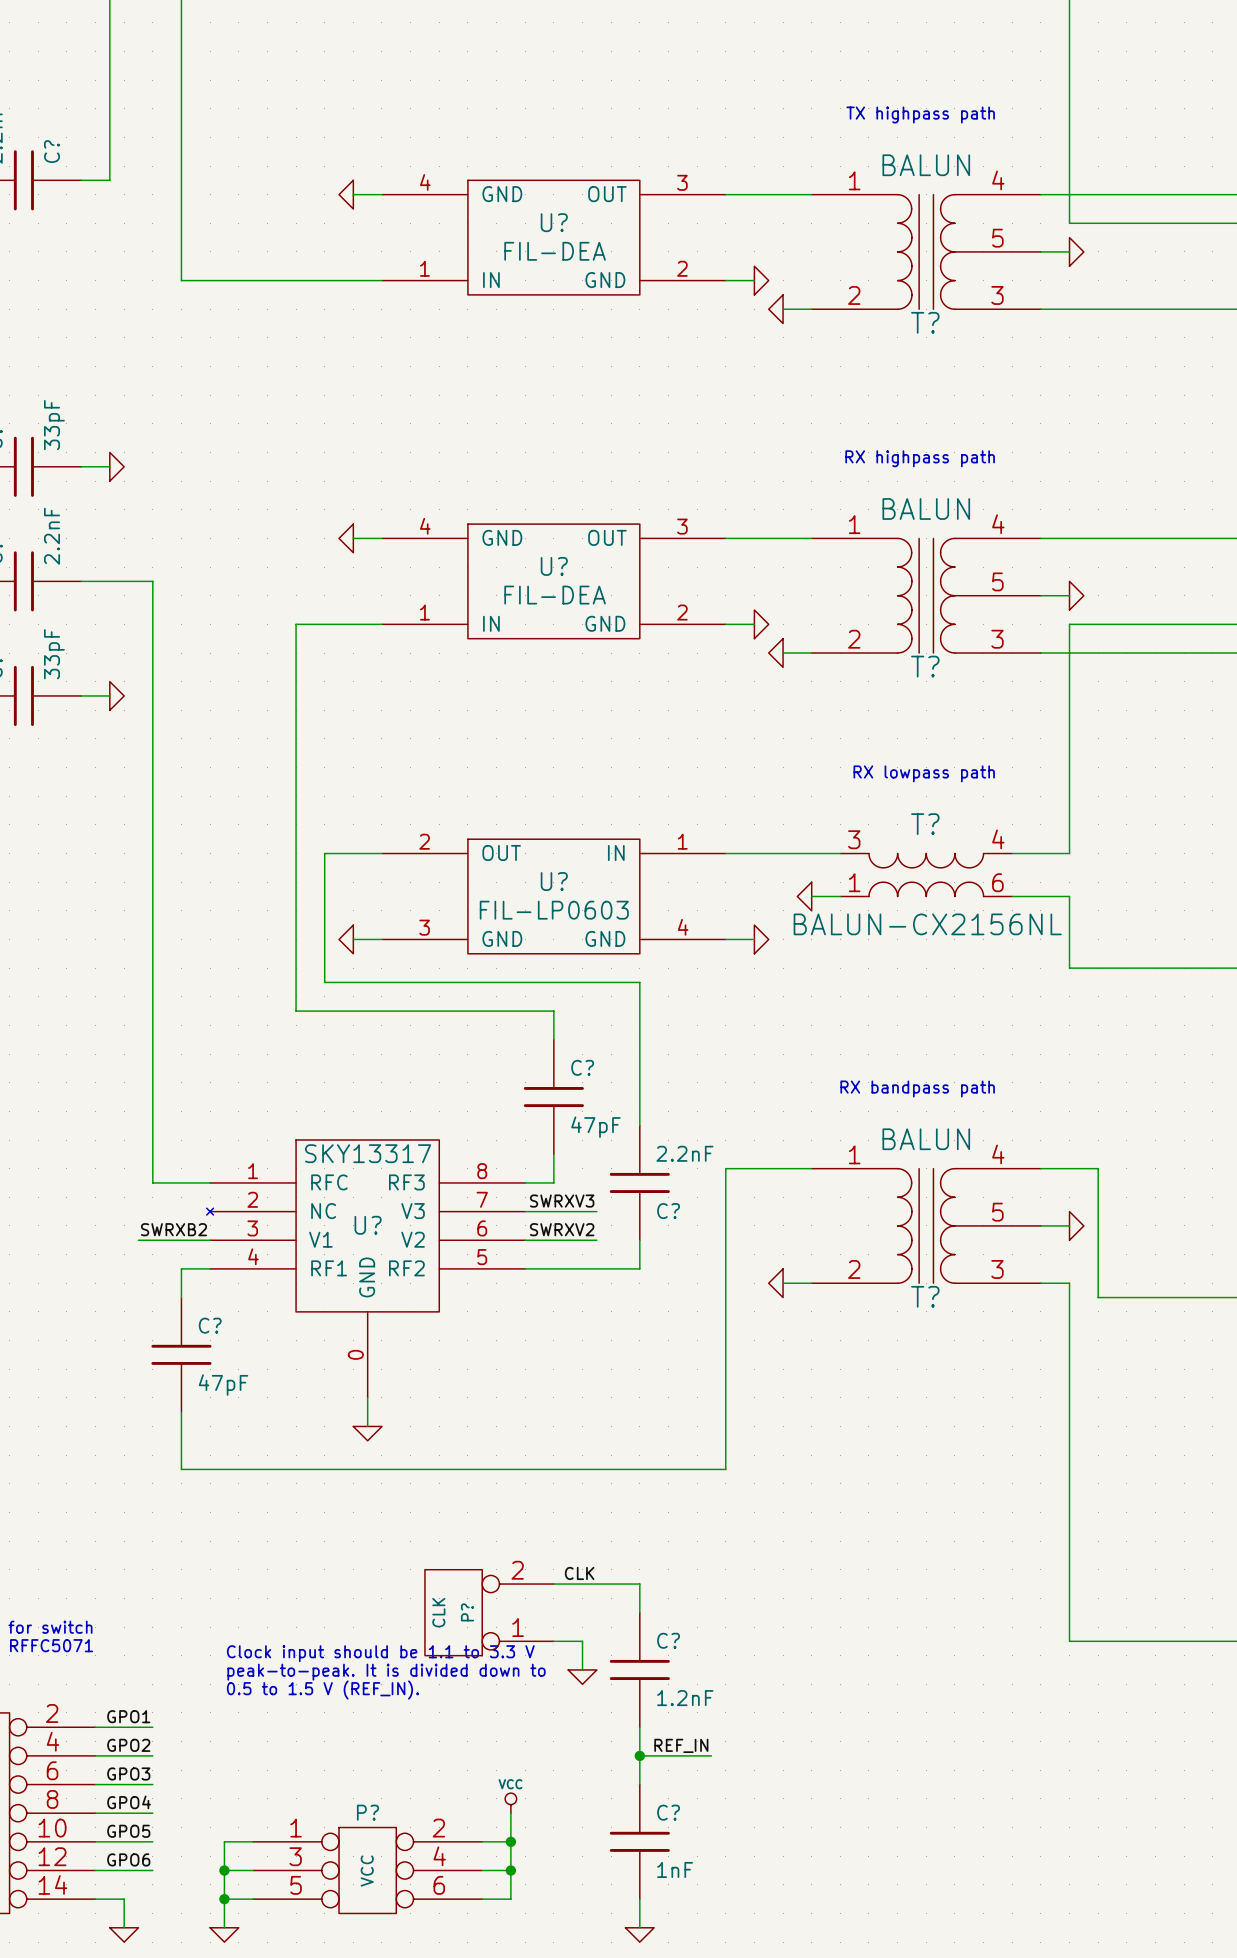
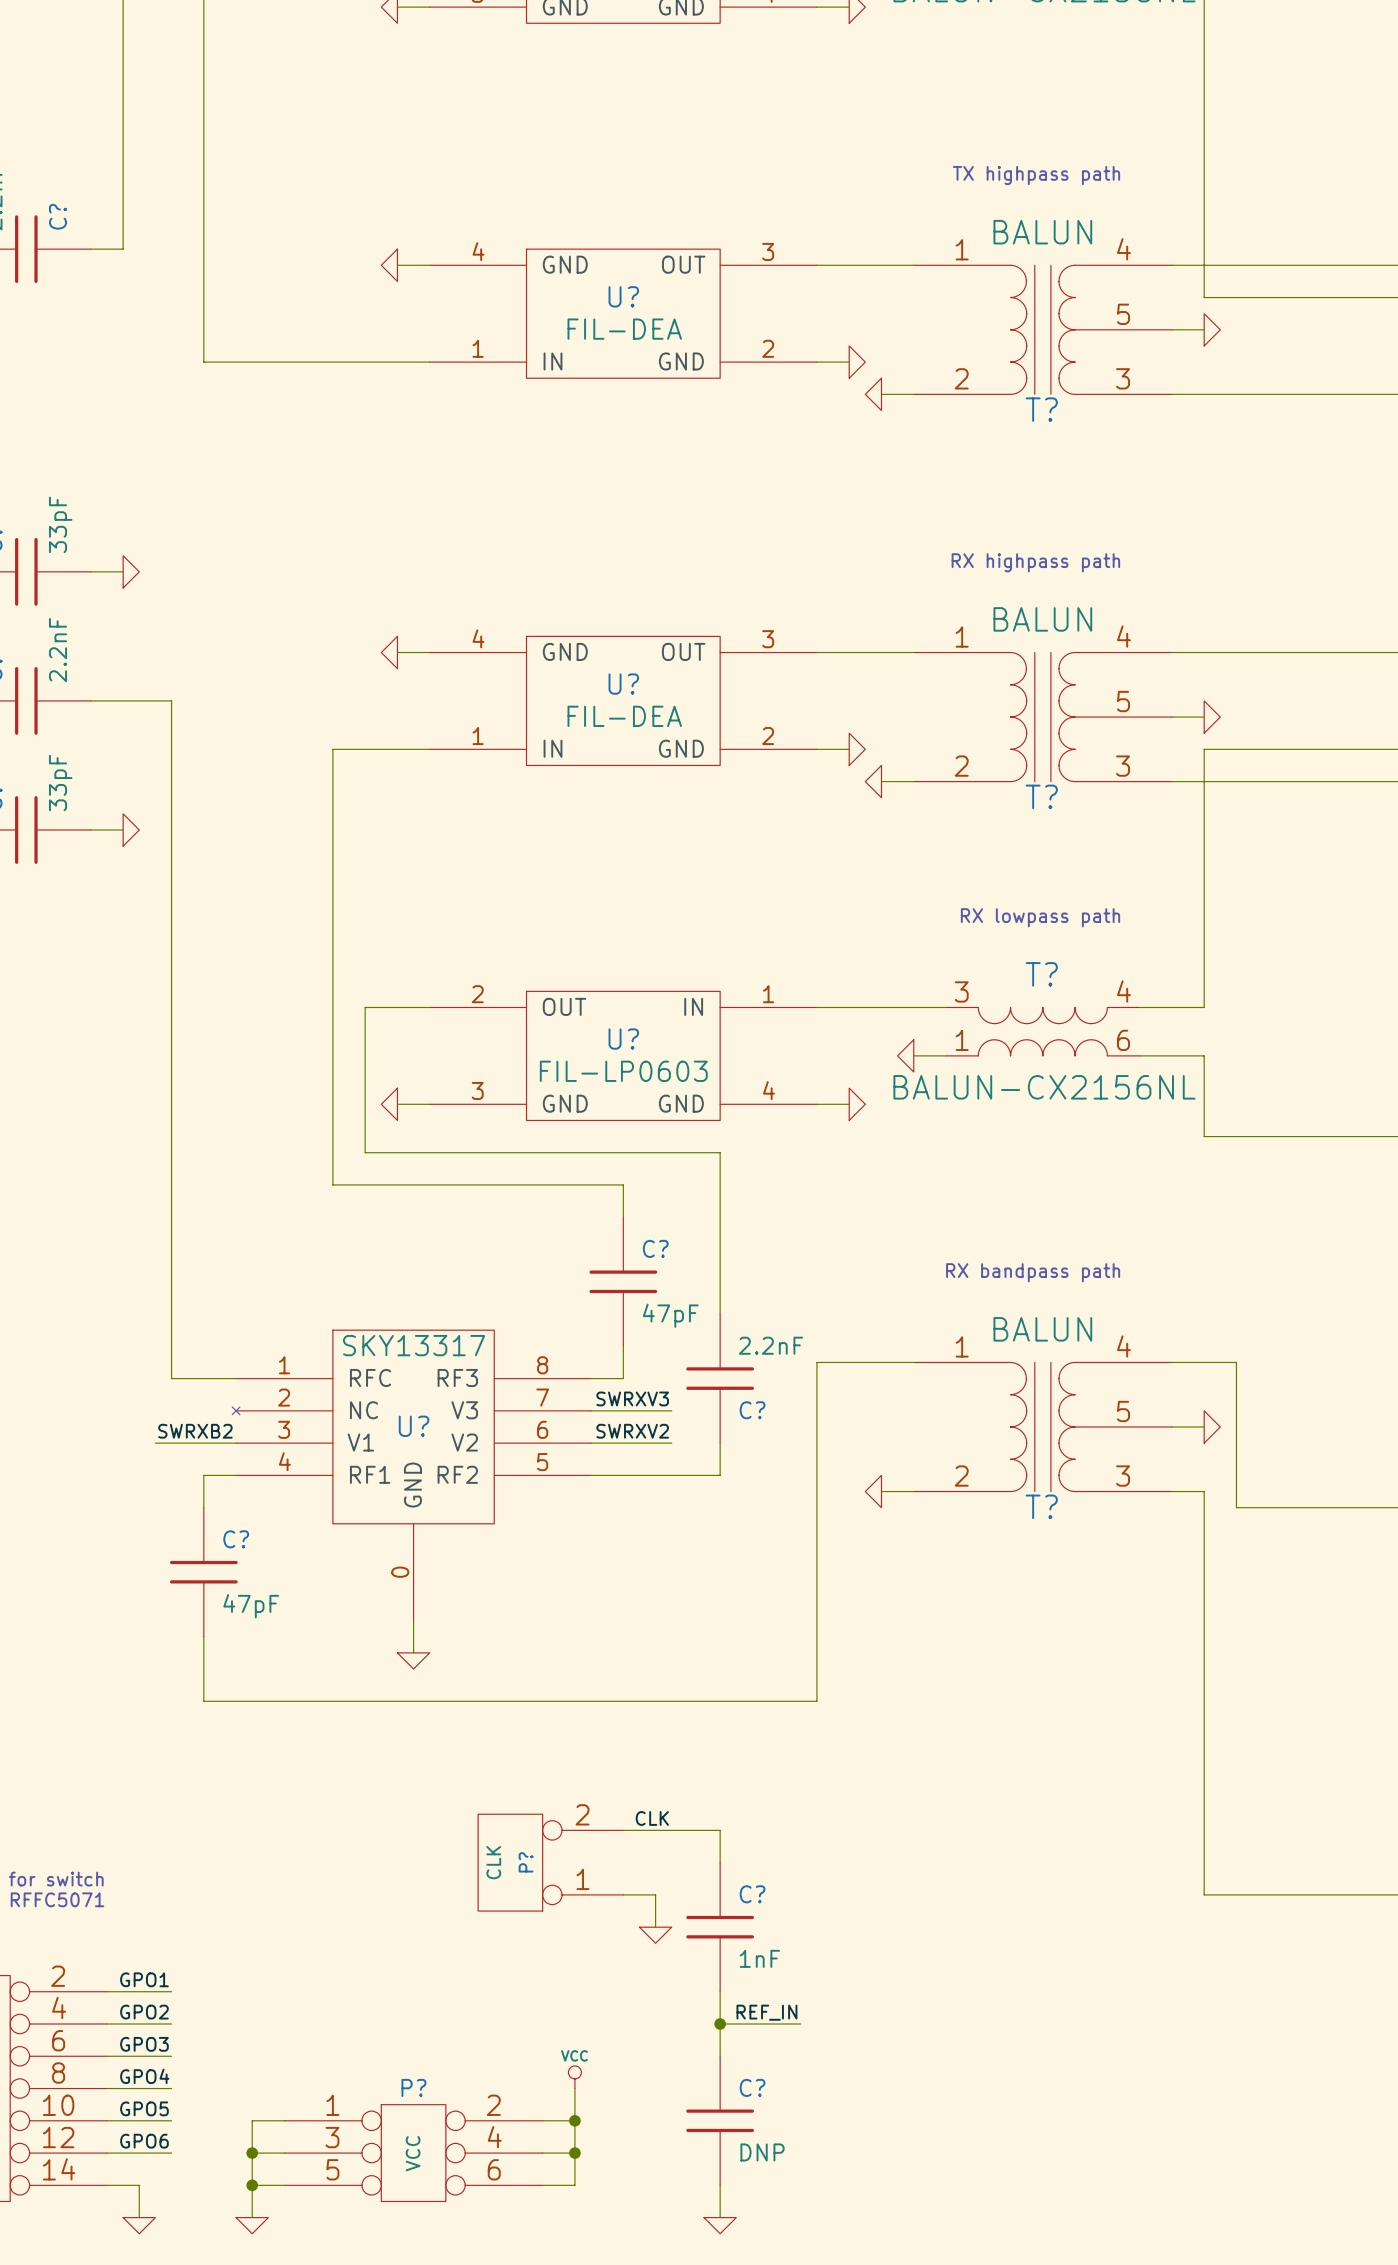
text: Clock input should be 1.1 to 3.3 V (380, 1653) -> none
text: peak-to-peak. It is divided down to (386, 1672) -> none
text: 0.5 to 1.5 V (REF_IN). (322, 1690) -> none
C? value: 1.2nF (685, 1698) -> 1nF (759, 1958)
C? value: 1nF (675, 1869) -> DNP (762, 2152)

